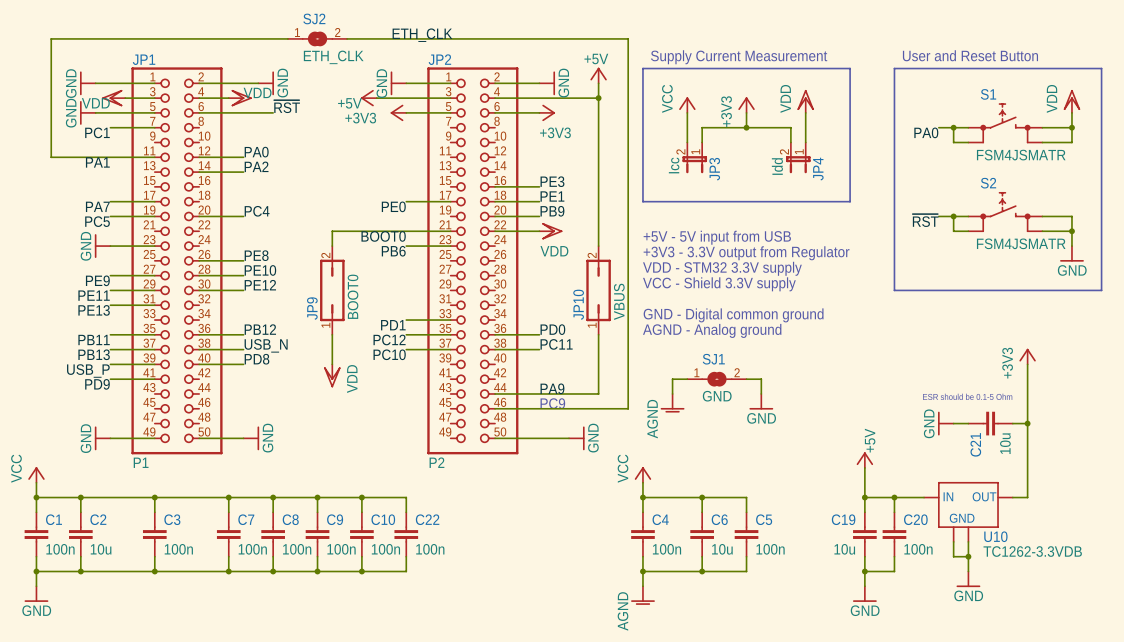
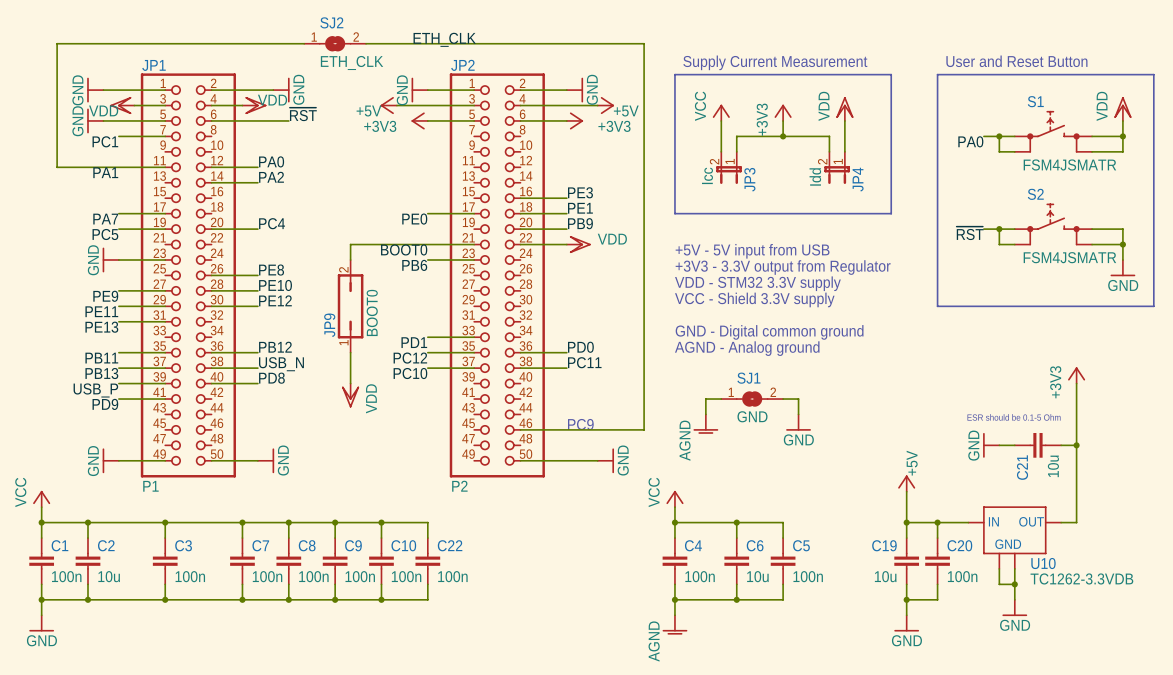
wire: (613, 38) (628, 38) (628, 408) (613, 408) -> (644, 43) (644, 429)
power symbol rotation: 0° (598, 74) -> 90° clockwise (607, 105)
power symbol position: +5V (598, 75) -> +5V (605, 105)
wire: (598, 83) (598, 246) -> none
junction: (598, 98) -> none
power symbol text position: +3V3 (555, 132) -> +3V3 (614, 126)
power symbol text position: VDD (554, 251) -> VDD (612, 239)
JP10: VBUS (598, 290) -> none
wire: (598, 334) (598, 393) (495, 393) -> none
label: PA9 (552, 388) -> none

